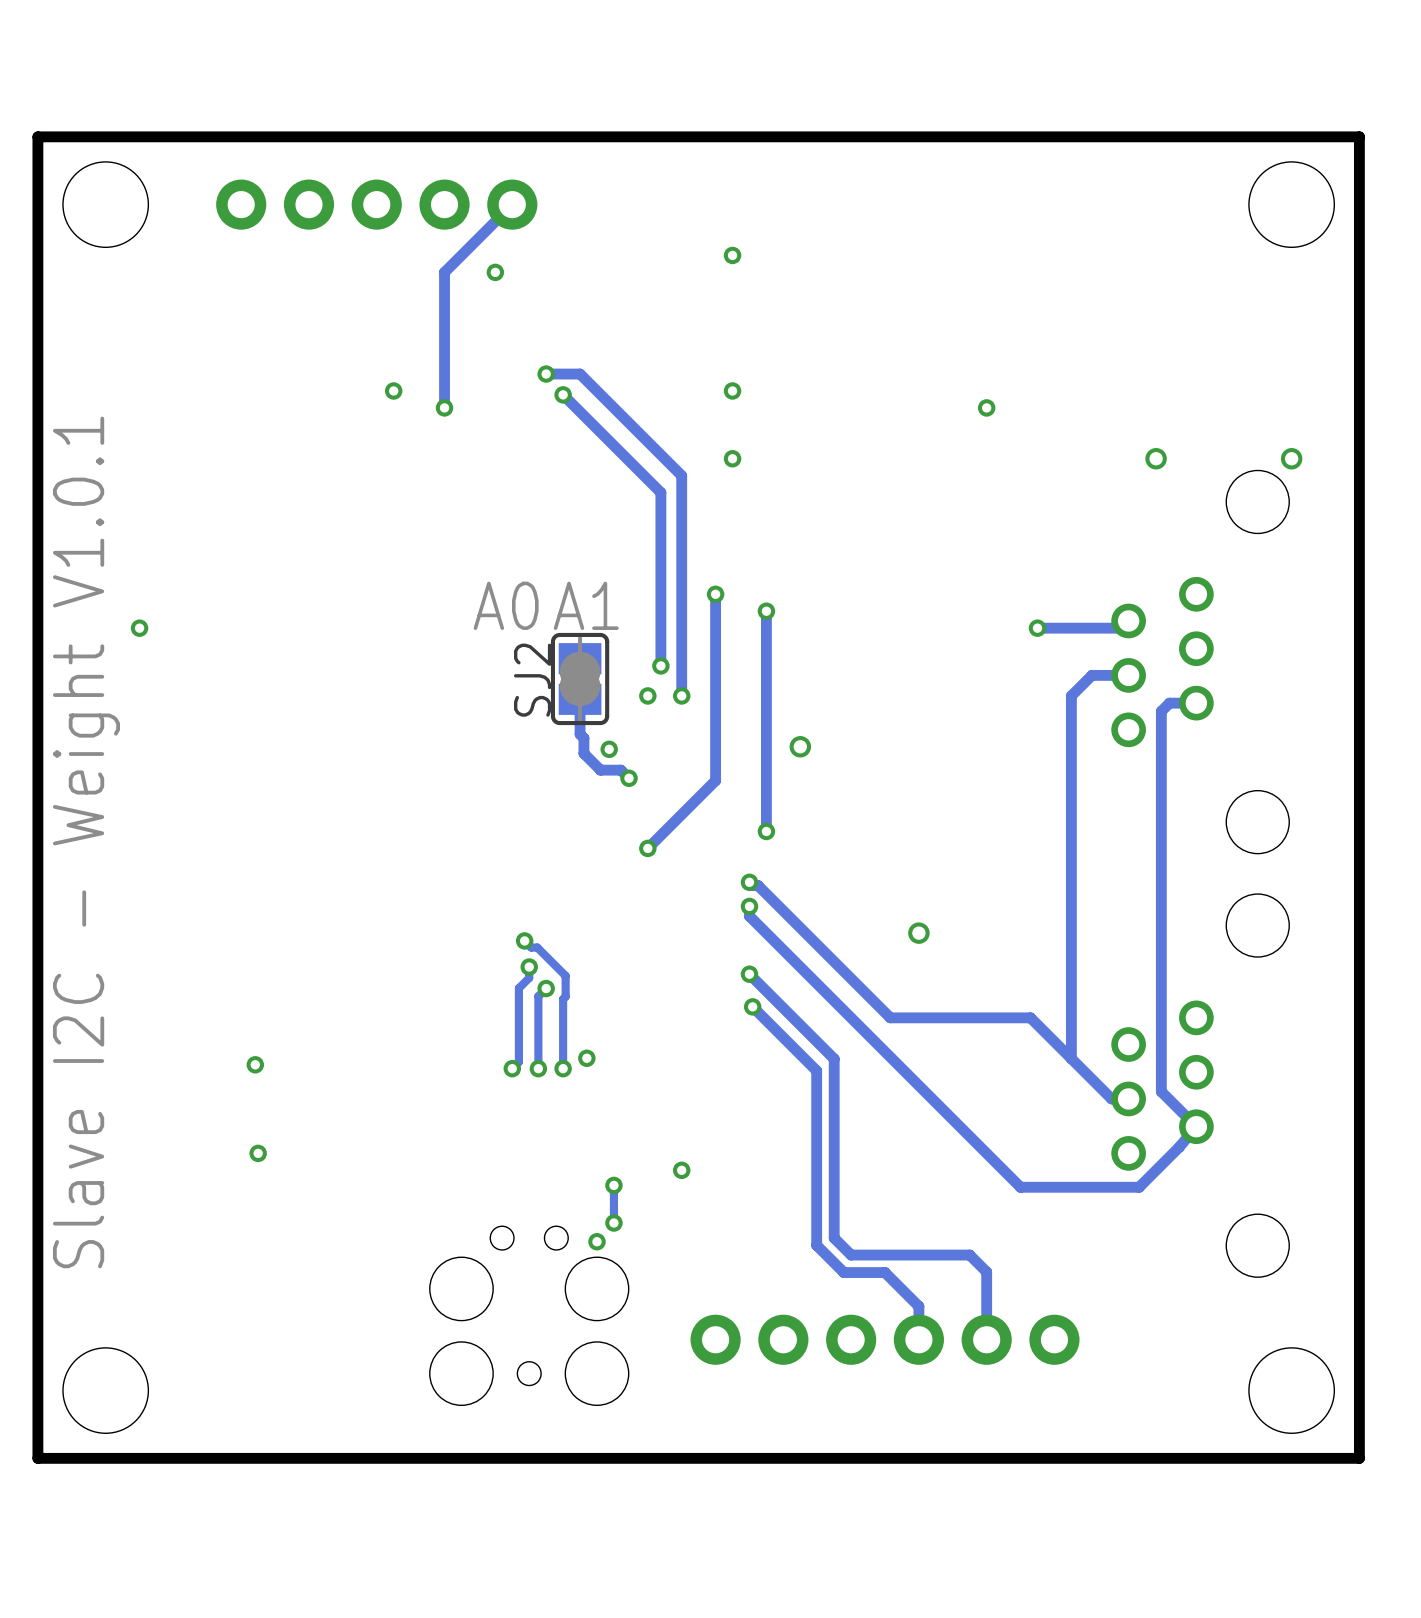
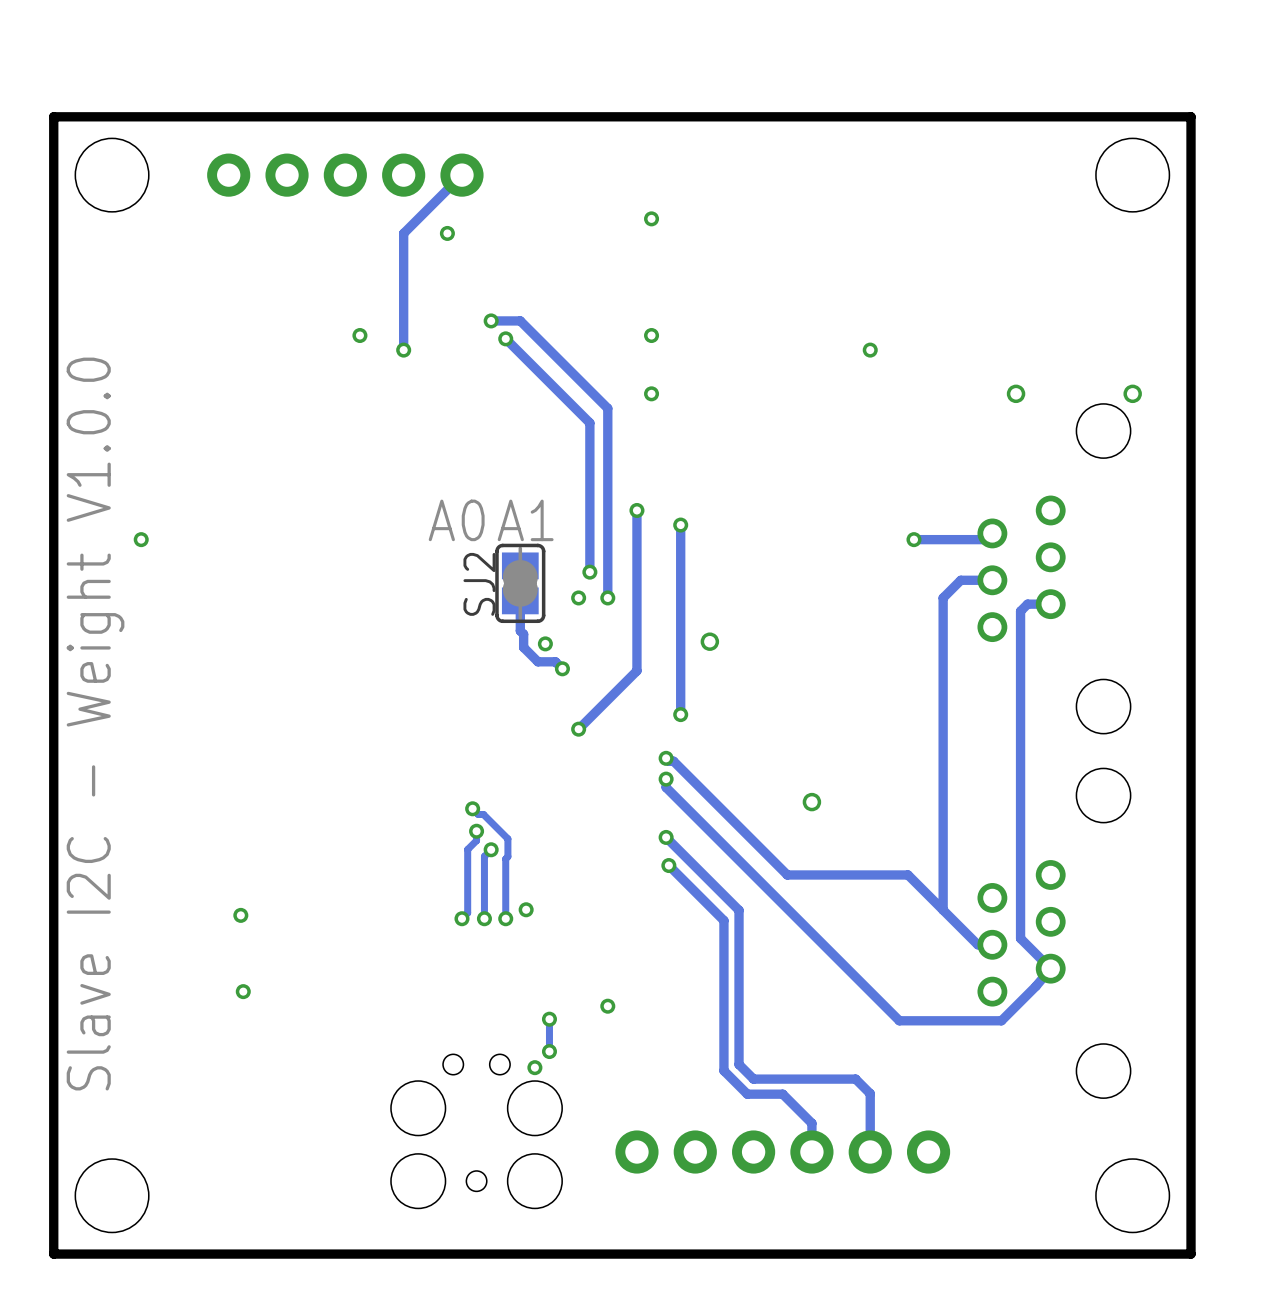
text: Slave I2C - Weight V1.0.1 (86, 842) -> Slave I2C - Weight V1.0.0 (95, 724)

